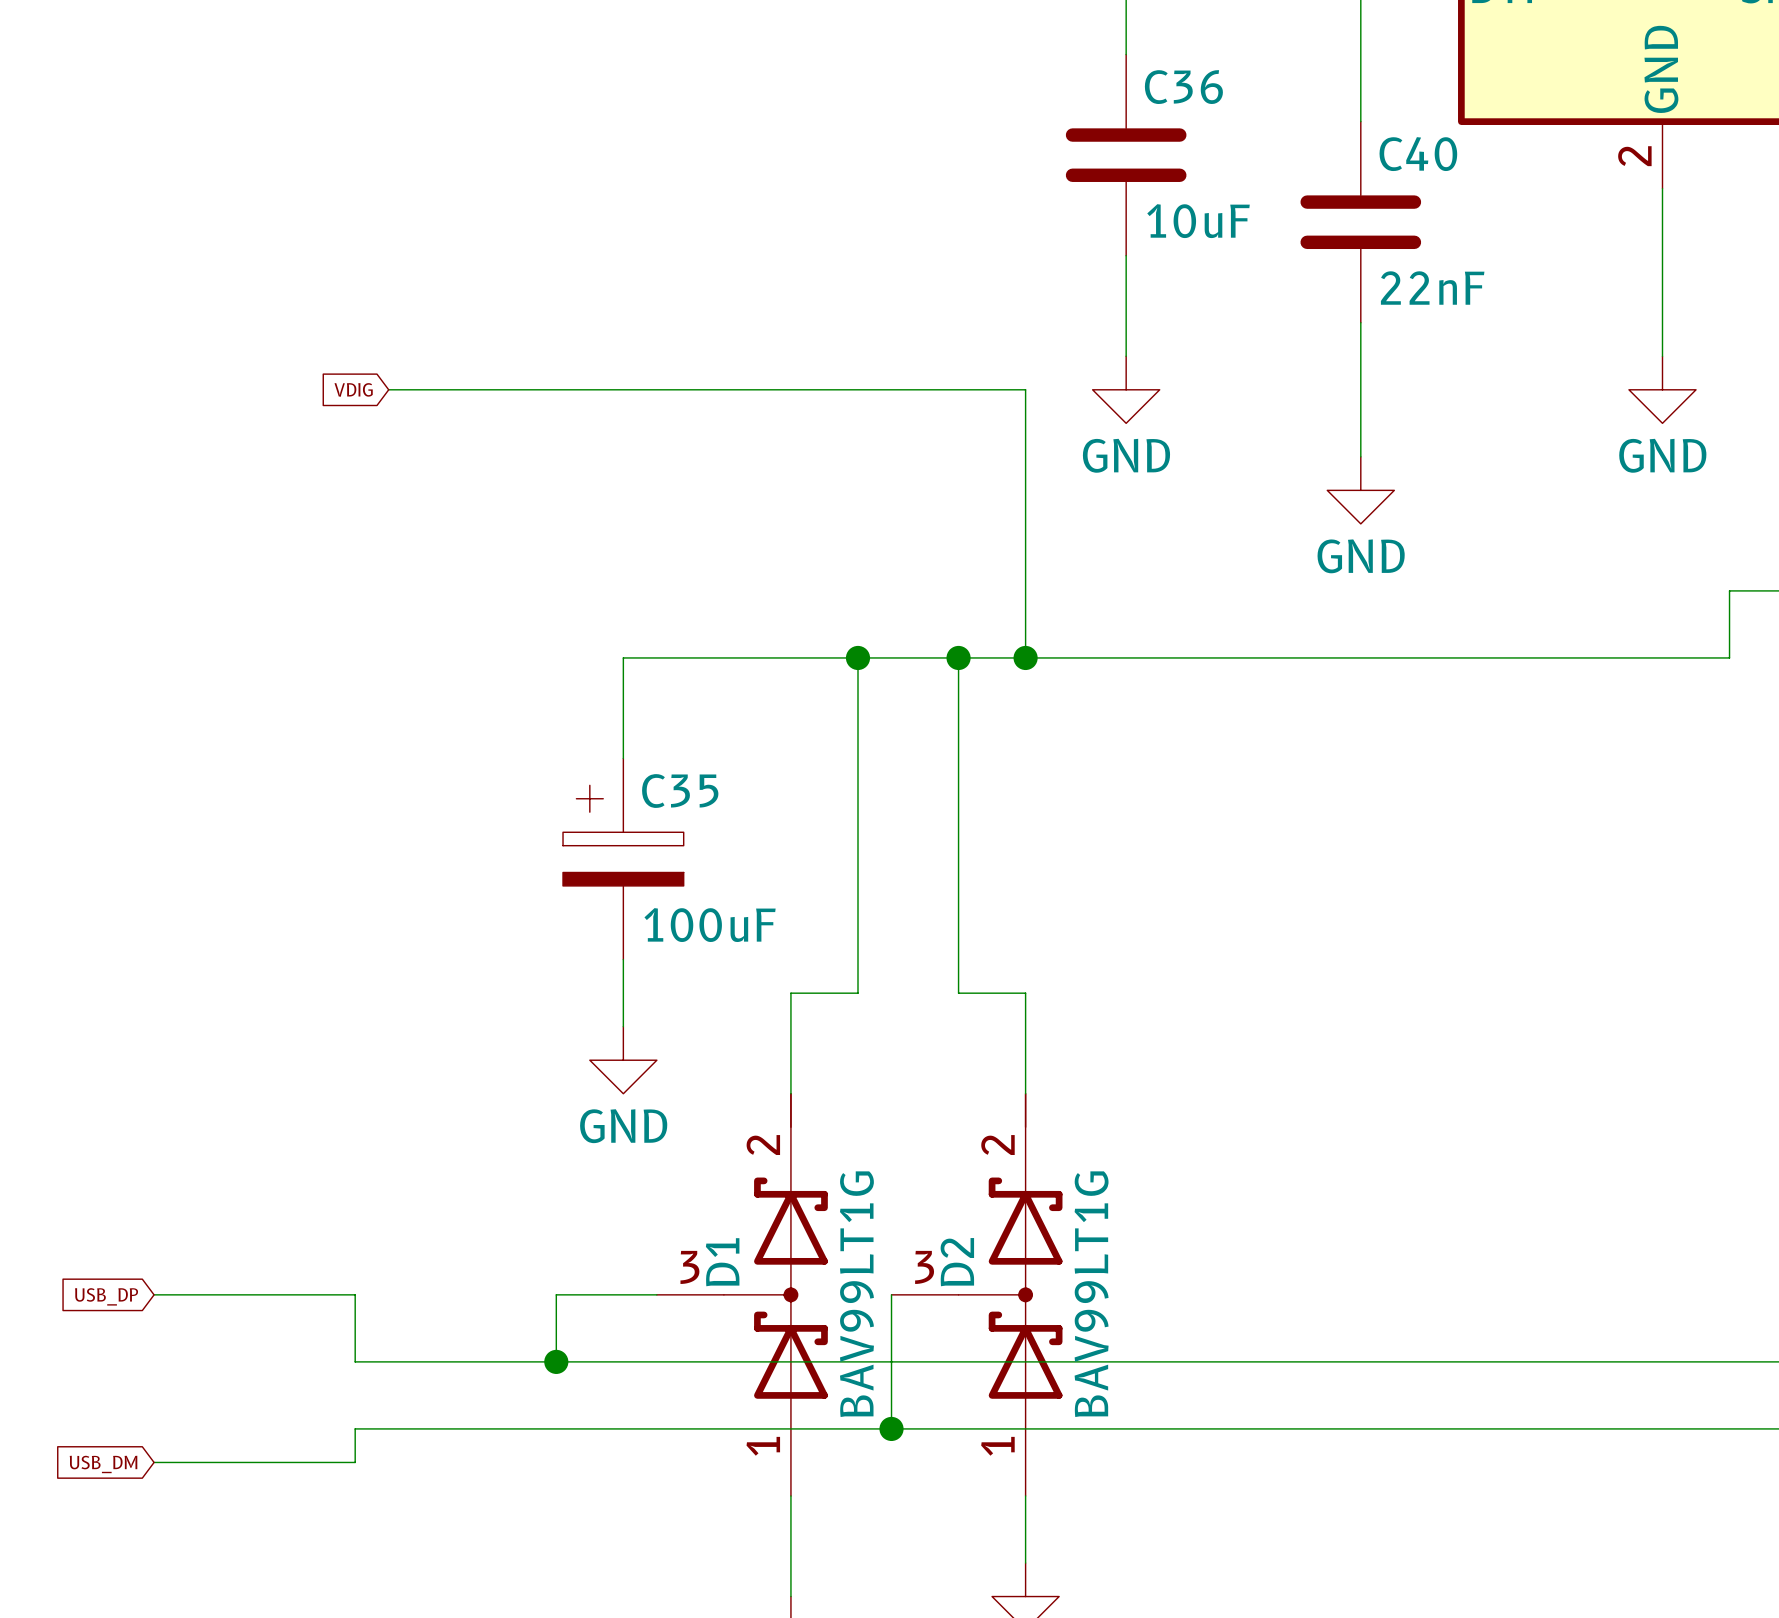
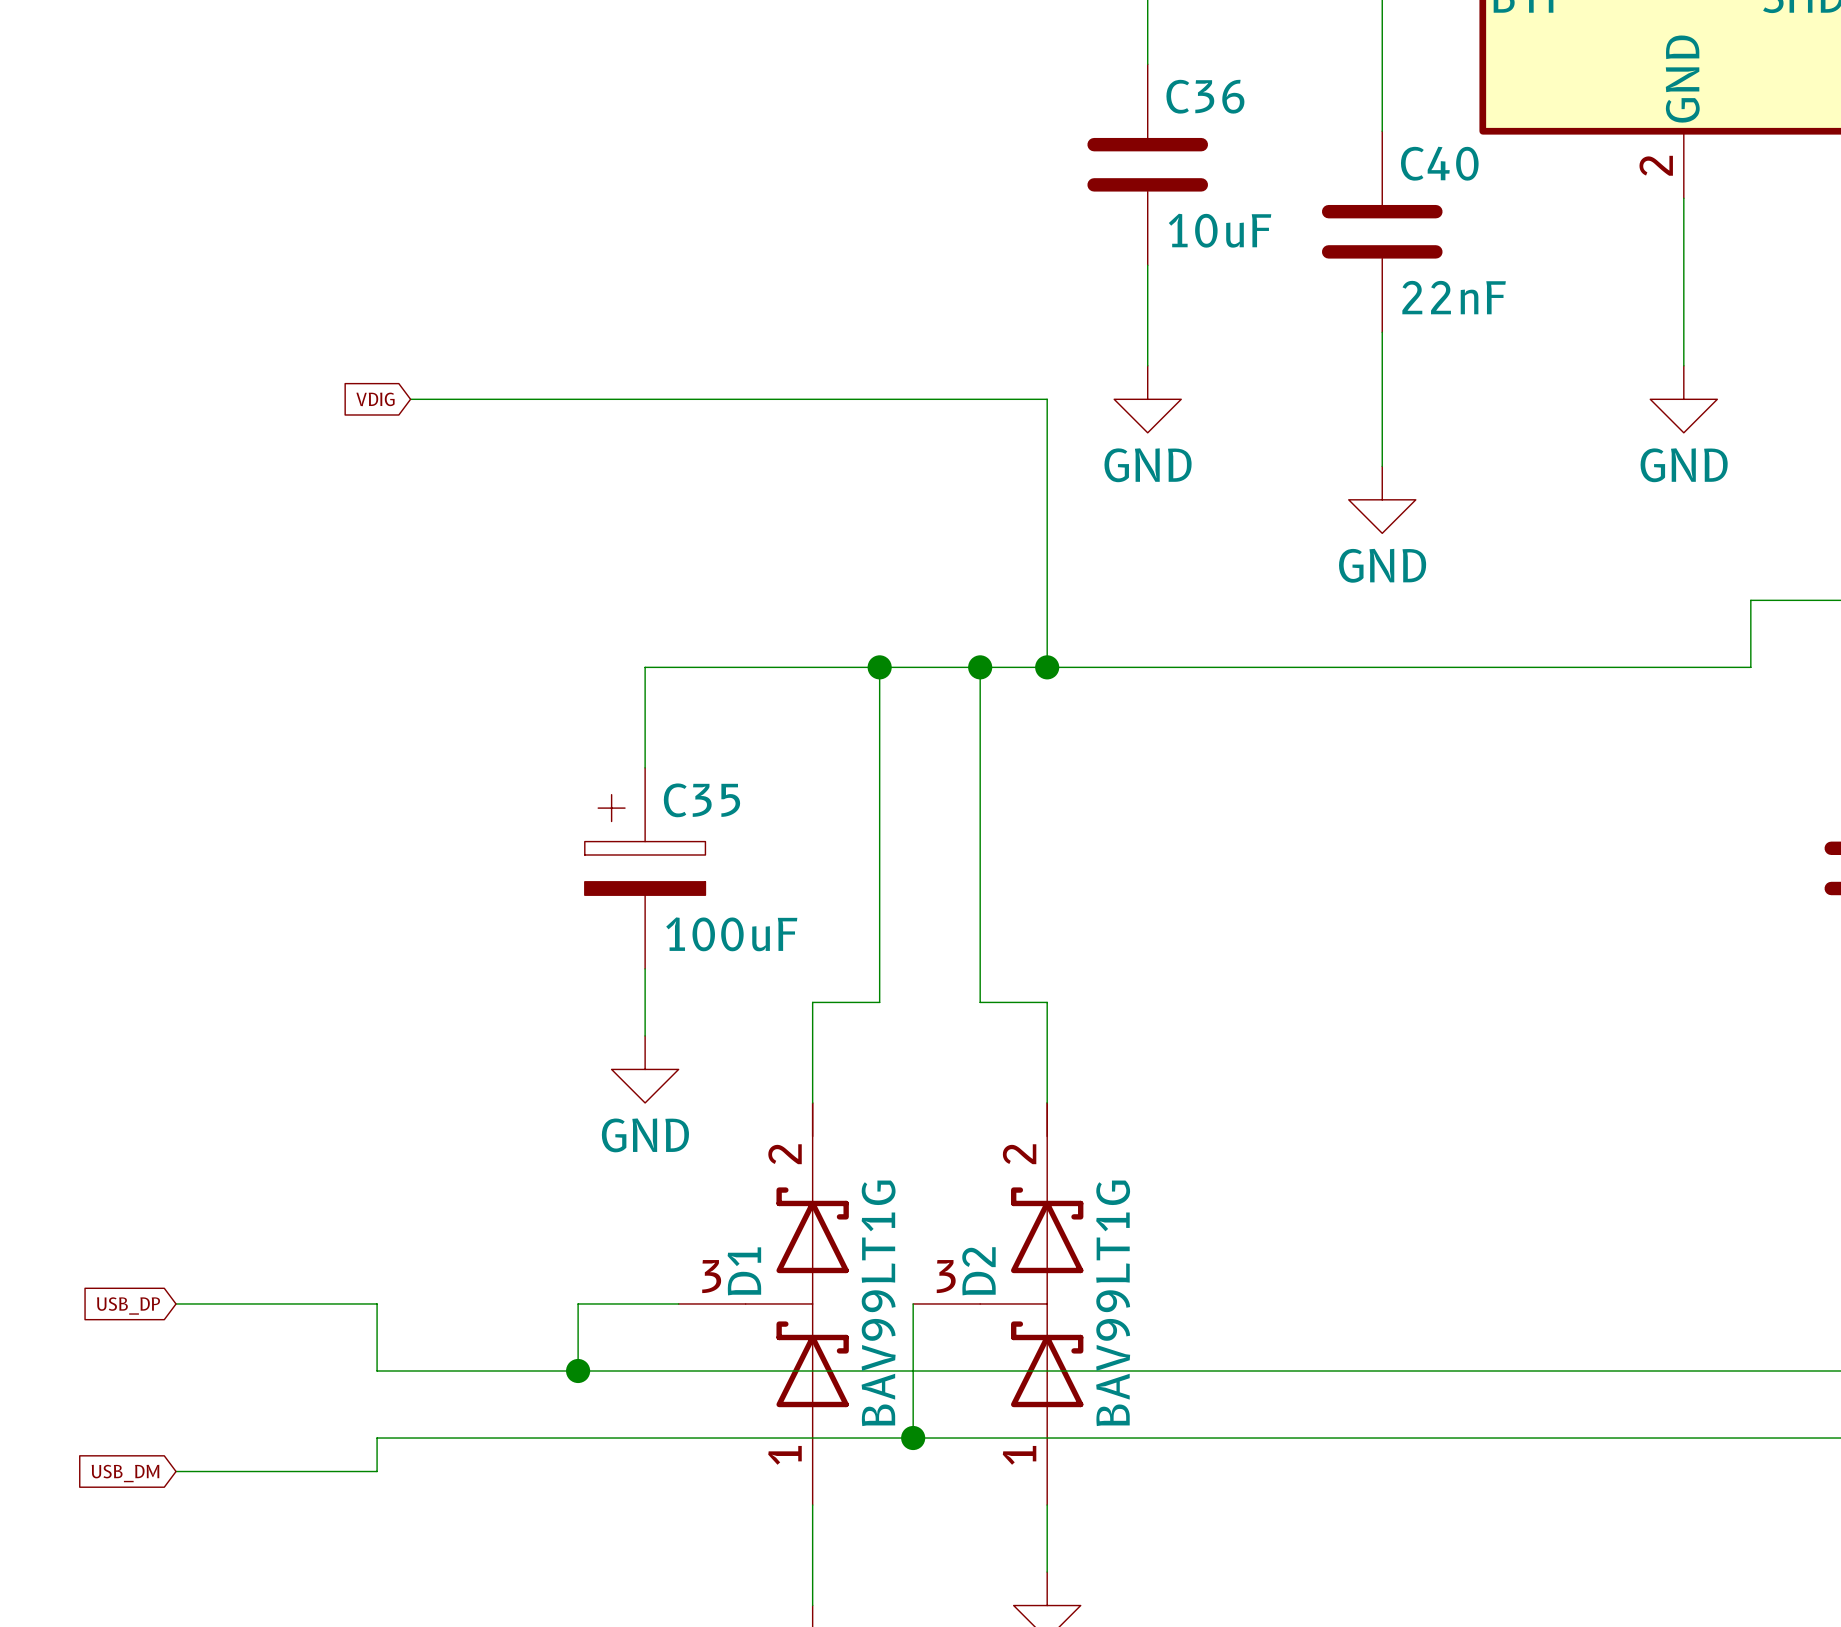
D1 symbol: [656, 1093, 828, 1496] -> [678, 1102, 849, 1506]
D2 symbol: [891, 1093, 1063, 1496] -> [913, 1102, 1084, 1506]

